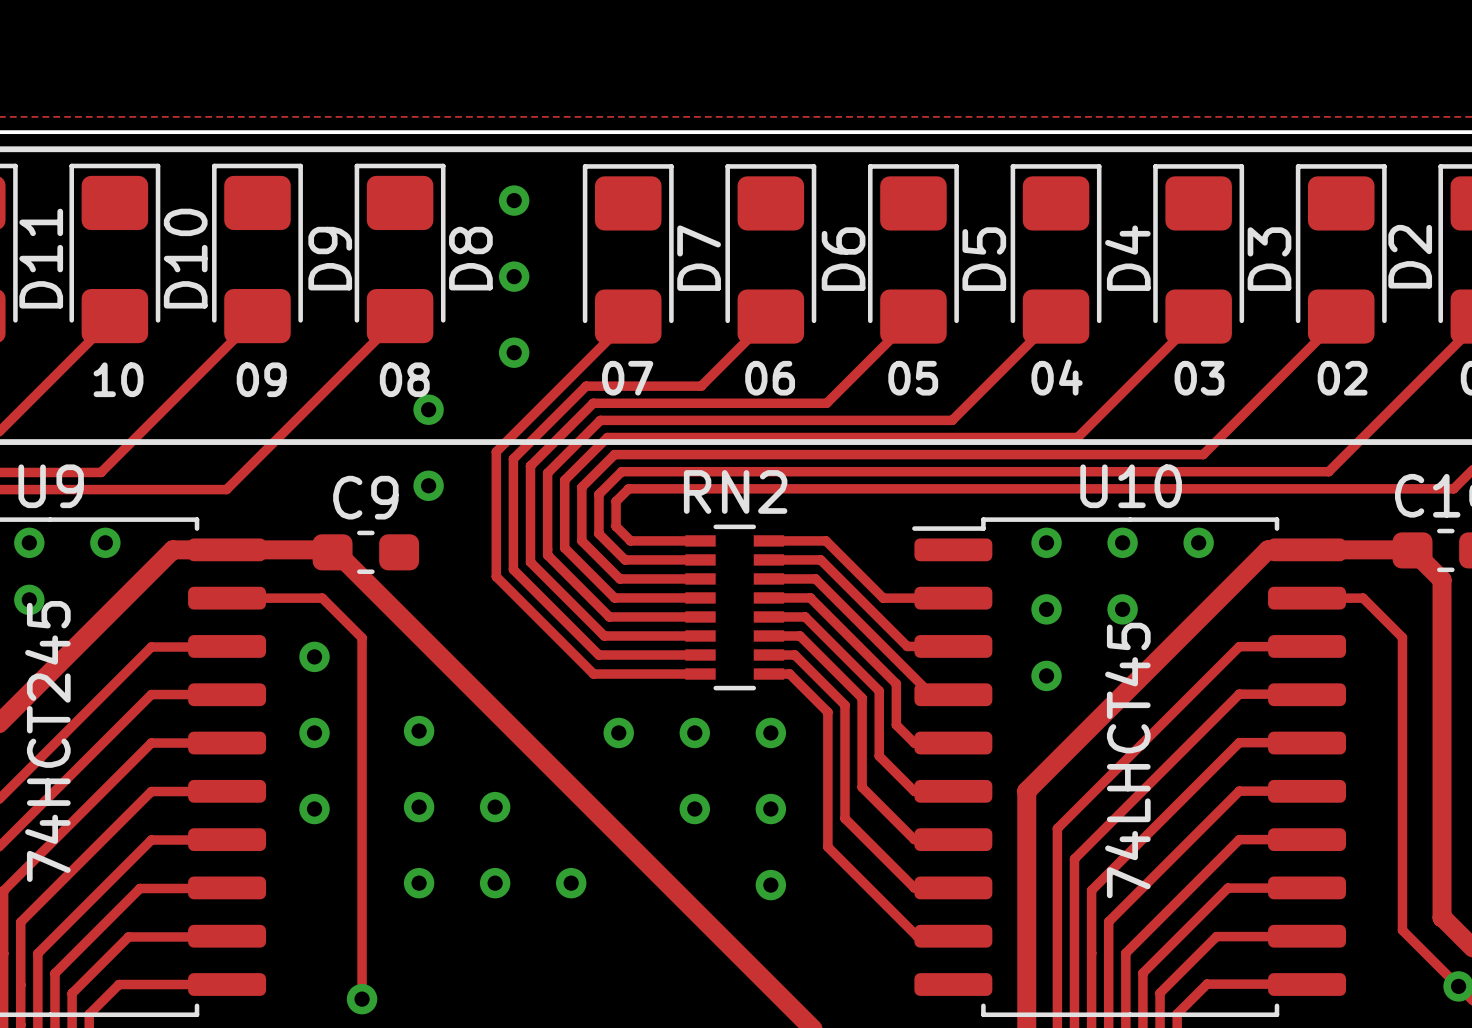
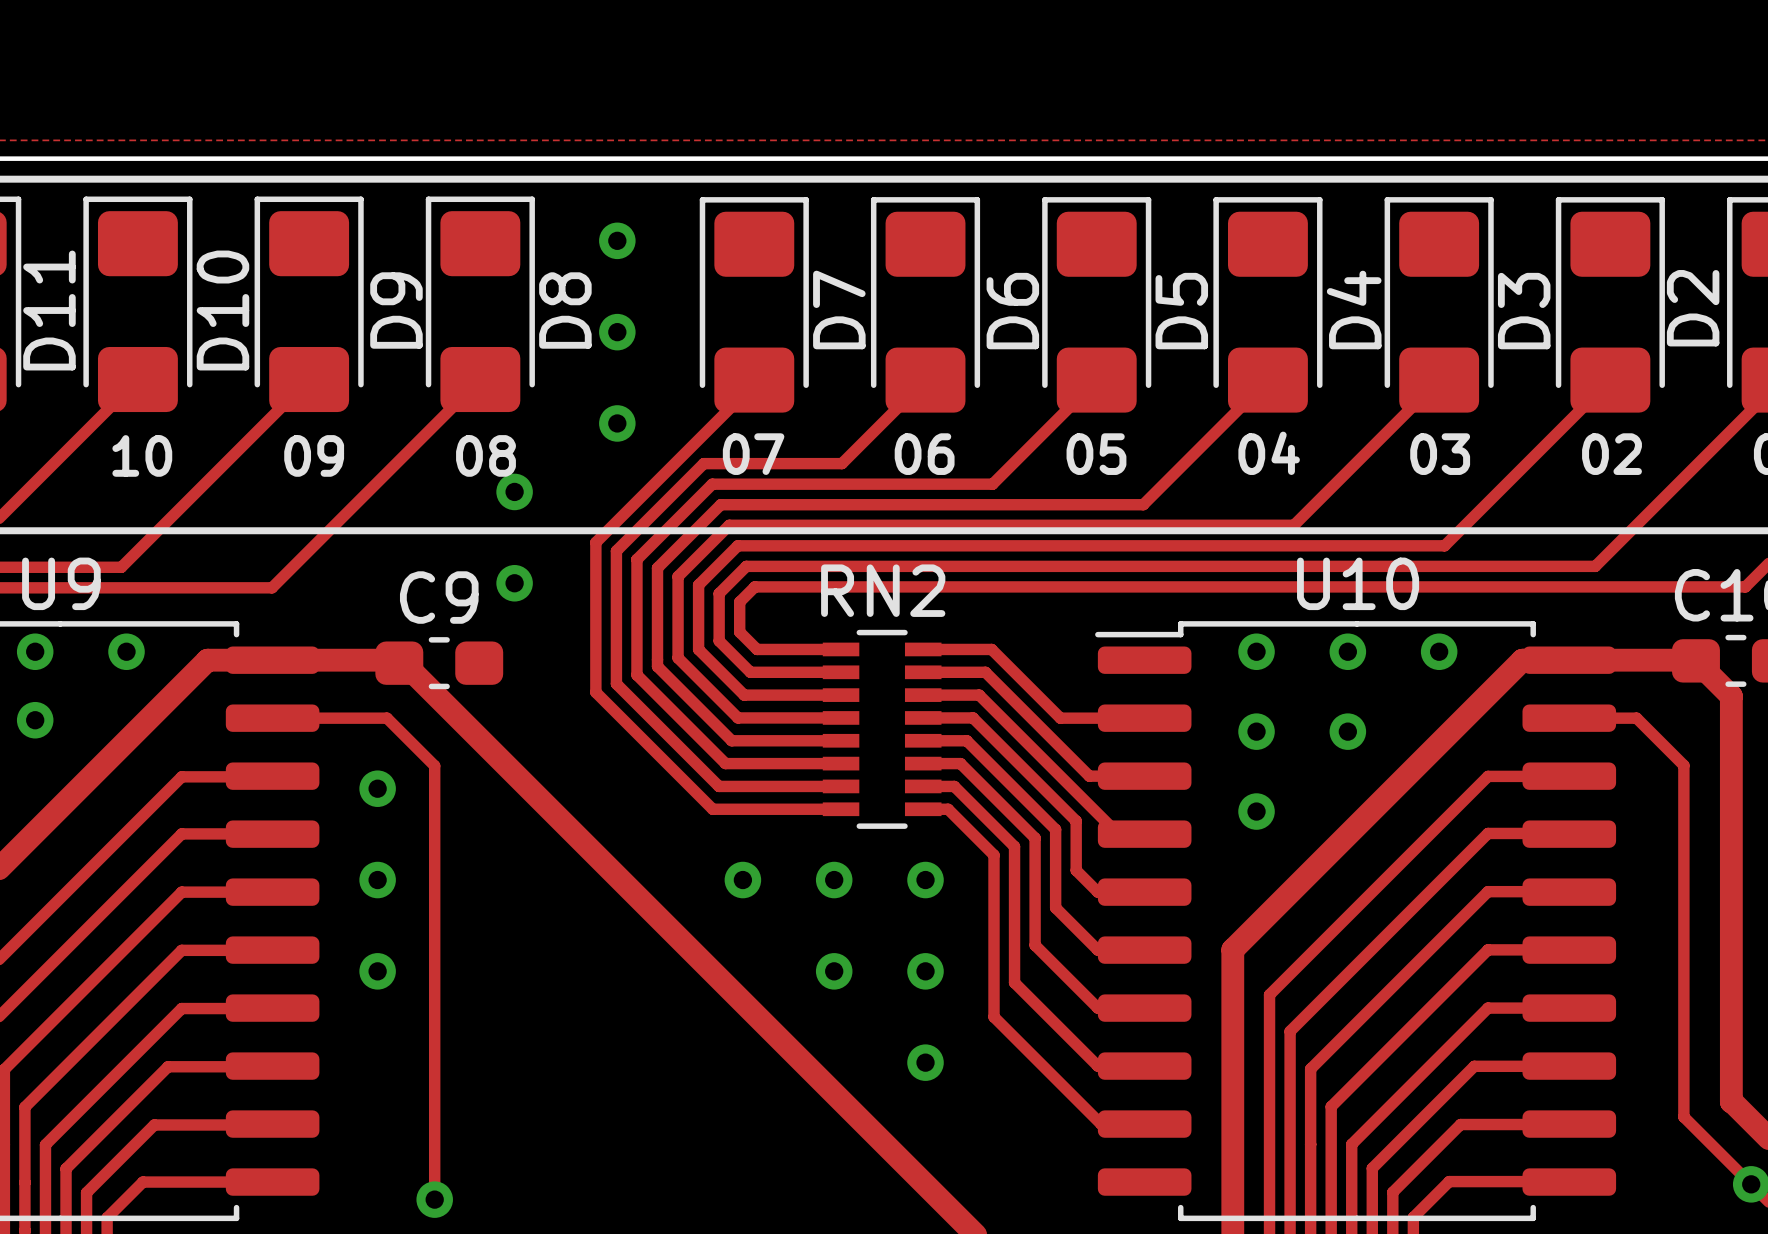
via: (419, 731) -> none
U9 value: 74HCT245 (47, 741) -> none
U10 value: 74LHCT45 (1127, 760) -> none
via: (419, 807) -> none
via: (495, 807) -> none
via: (419, 883) -> none
via: (495, 883) -> none
via: (571, 883) -> none

